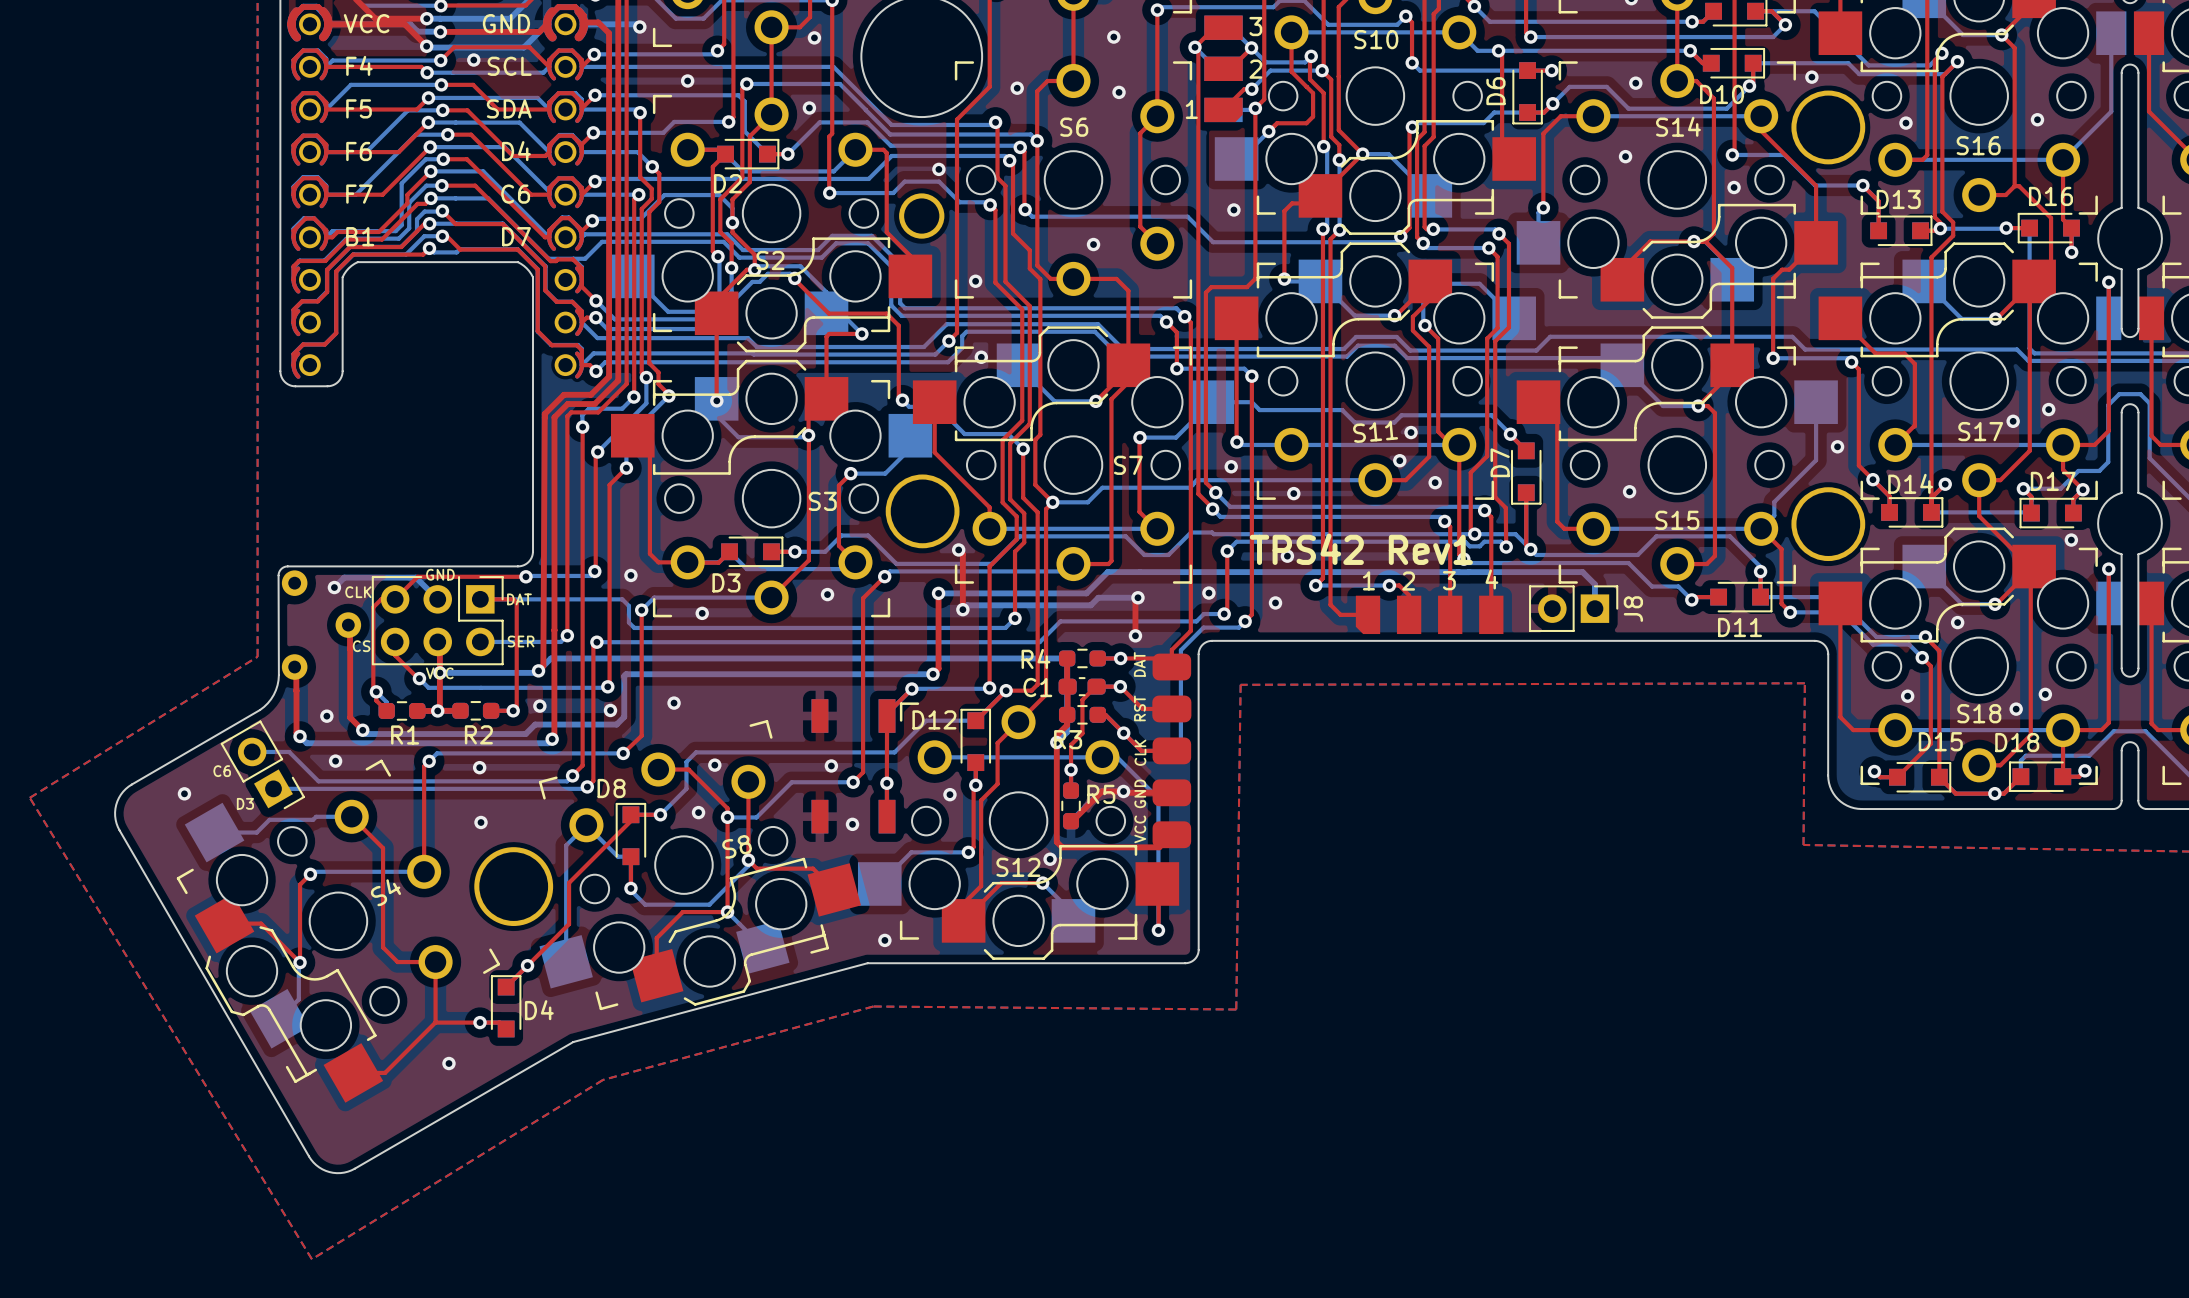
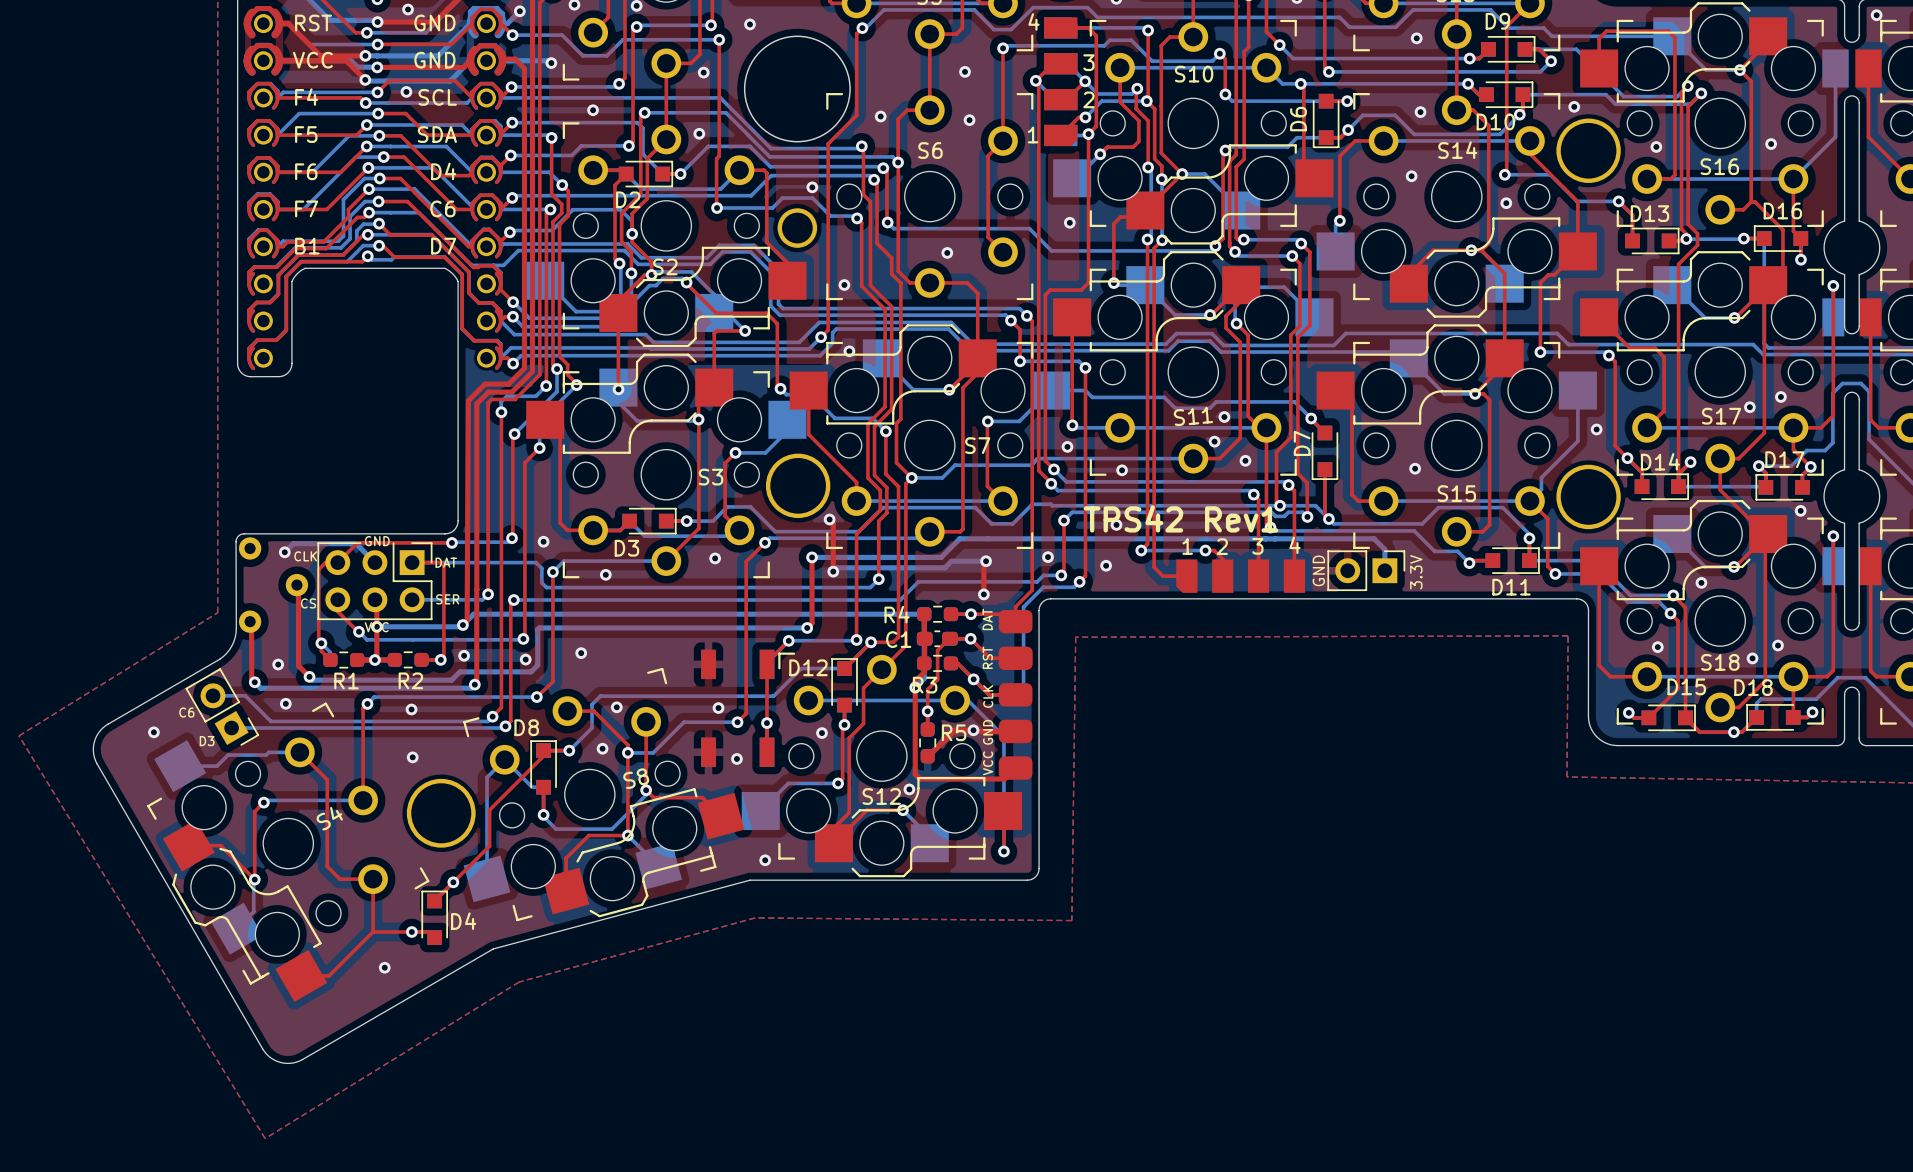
text: none -> GND (1318, 570)
J8 name: J8 (1633, 609) -> none
text: none -> 3.3V (1416, 572)

